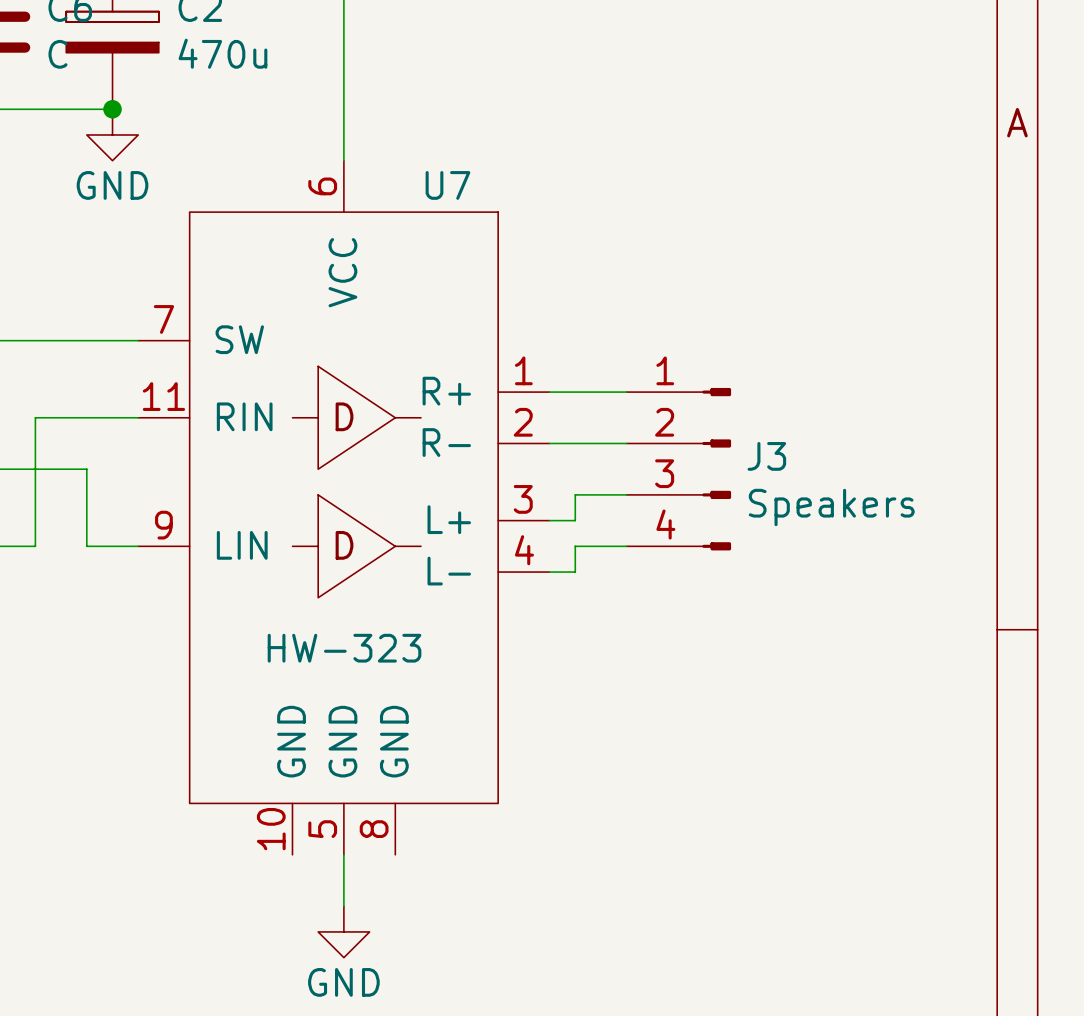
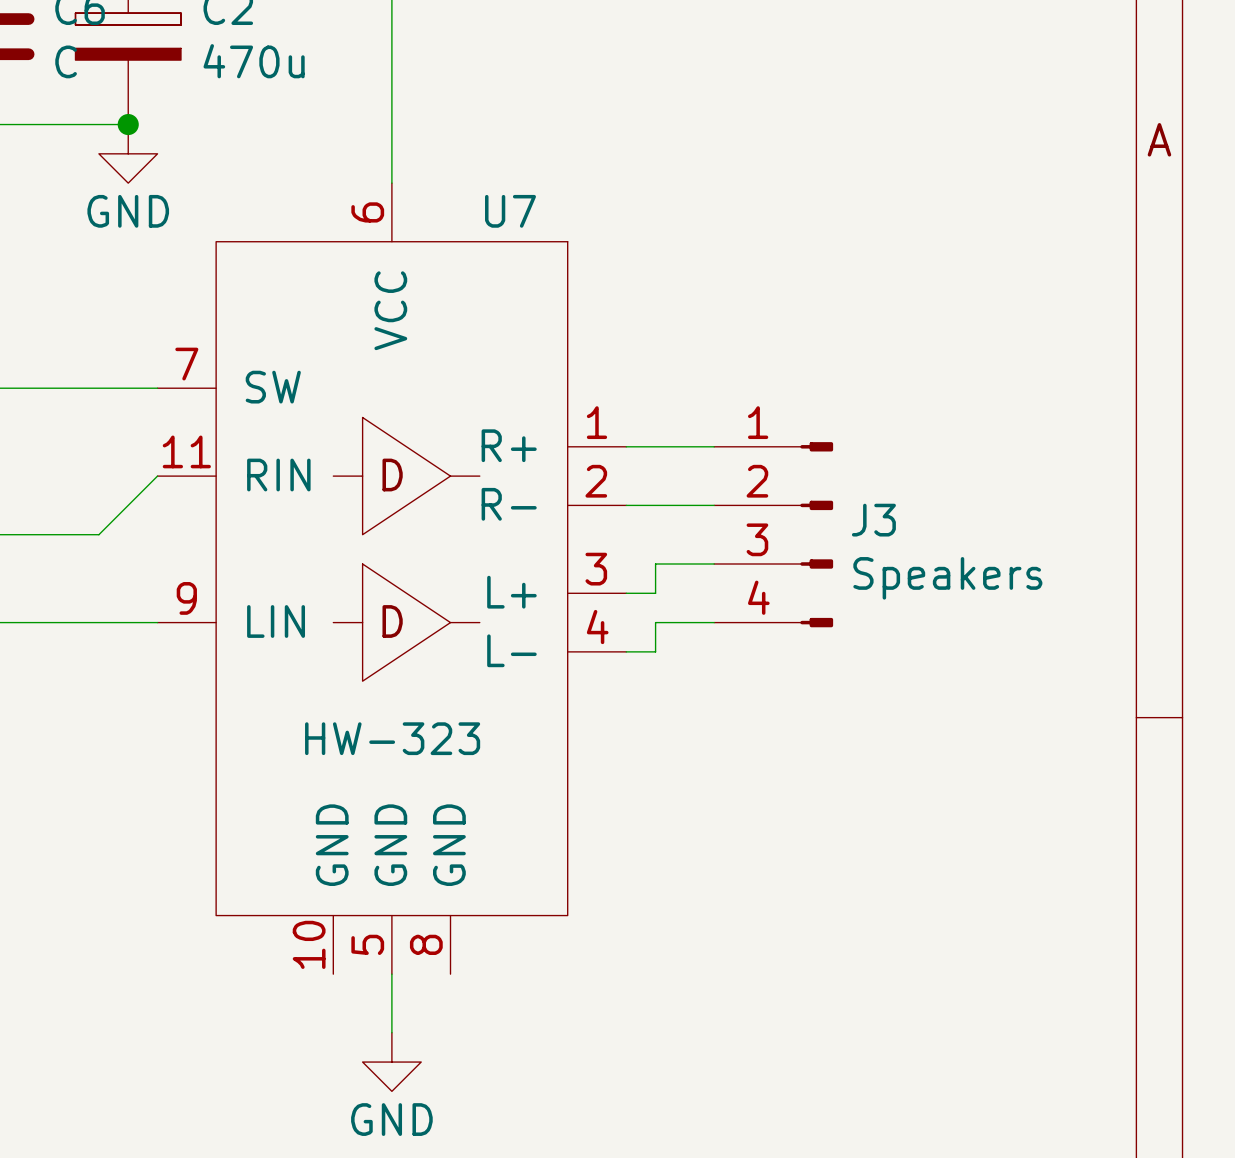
wire: (138, 417) (35, 417) (35, 546) -> (157, 476) (98, 534)
wire: (86, 469) (86, 546) -> (40, 622) (98, 622)

